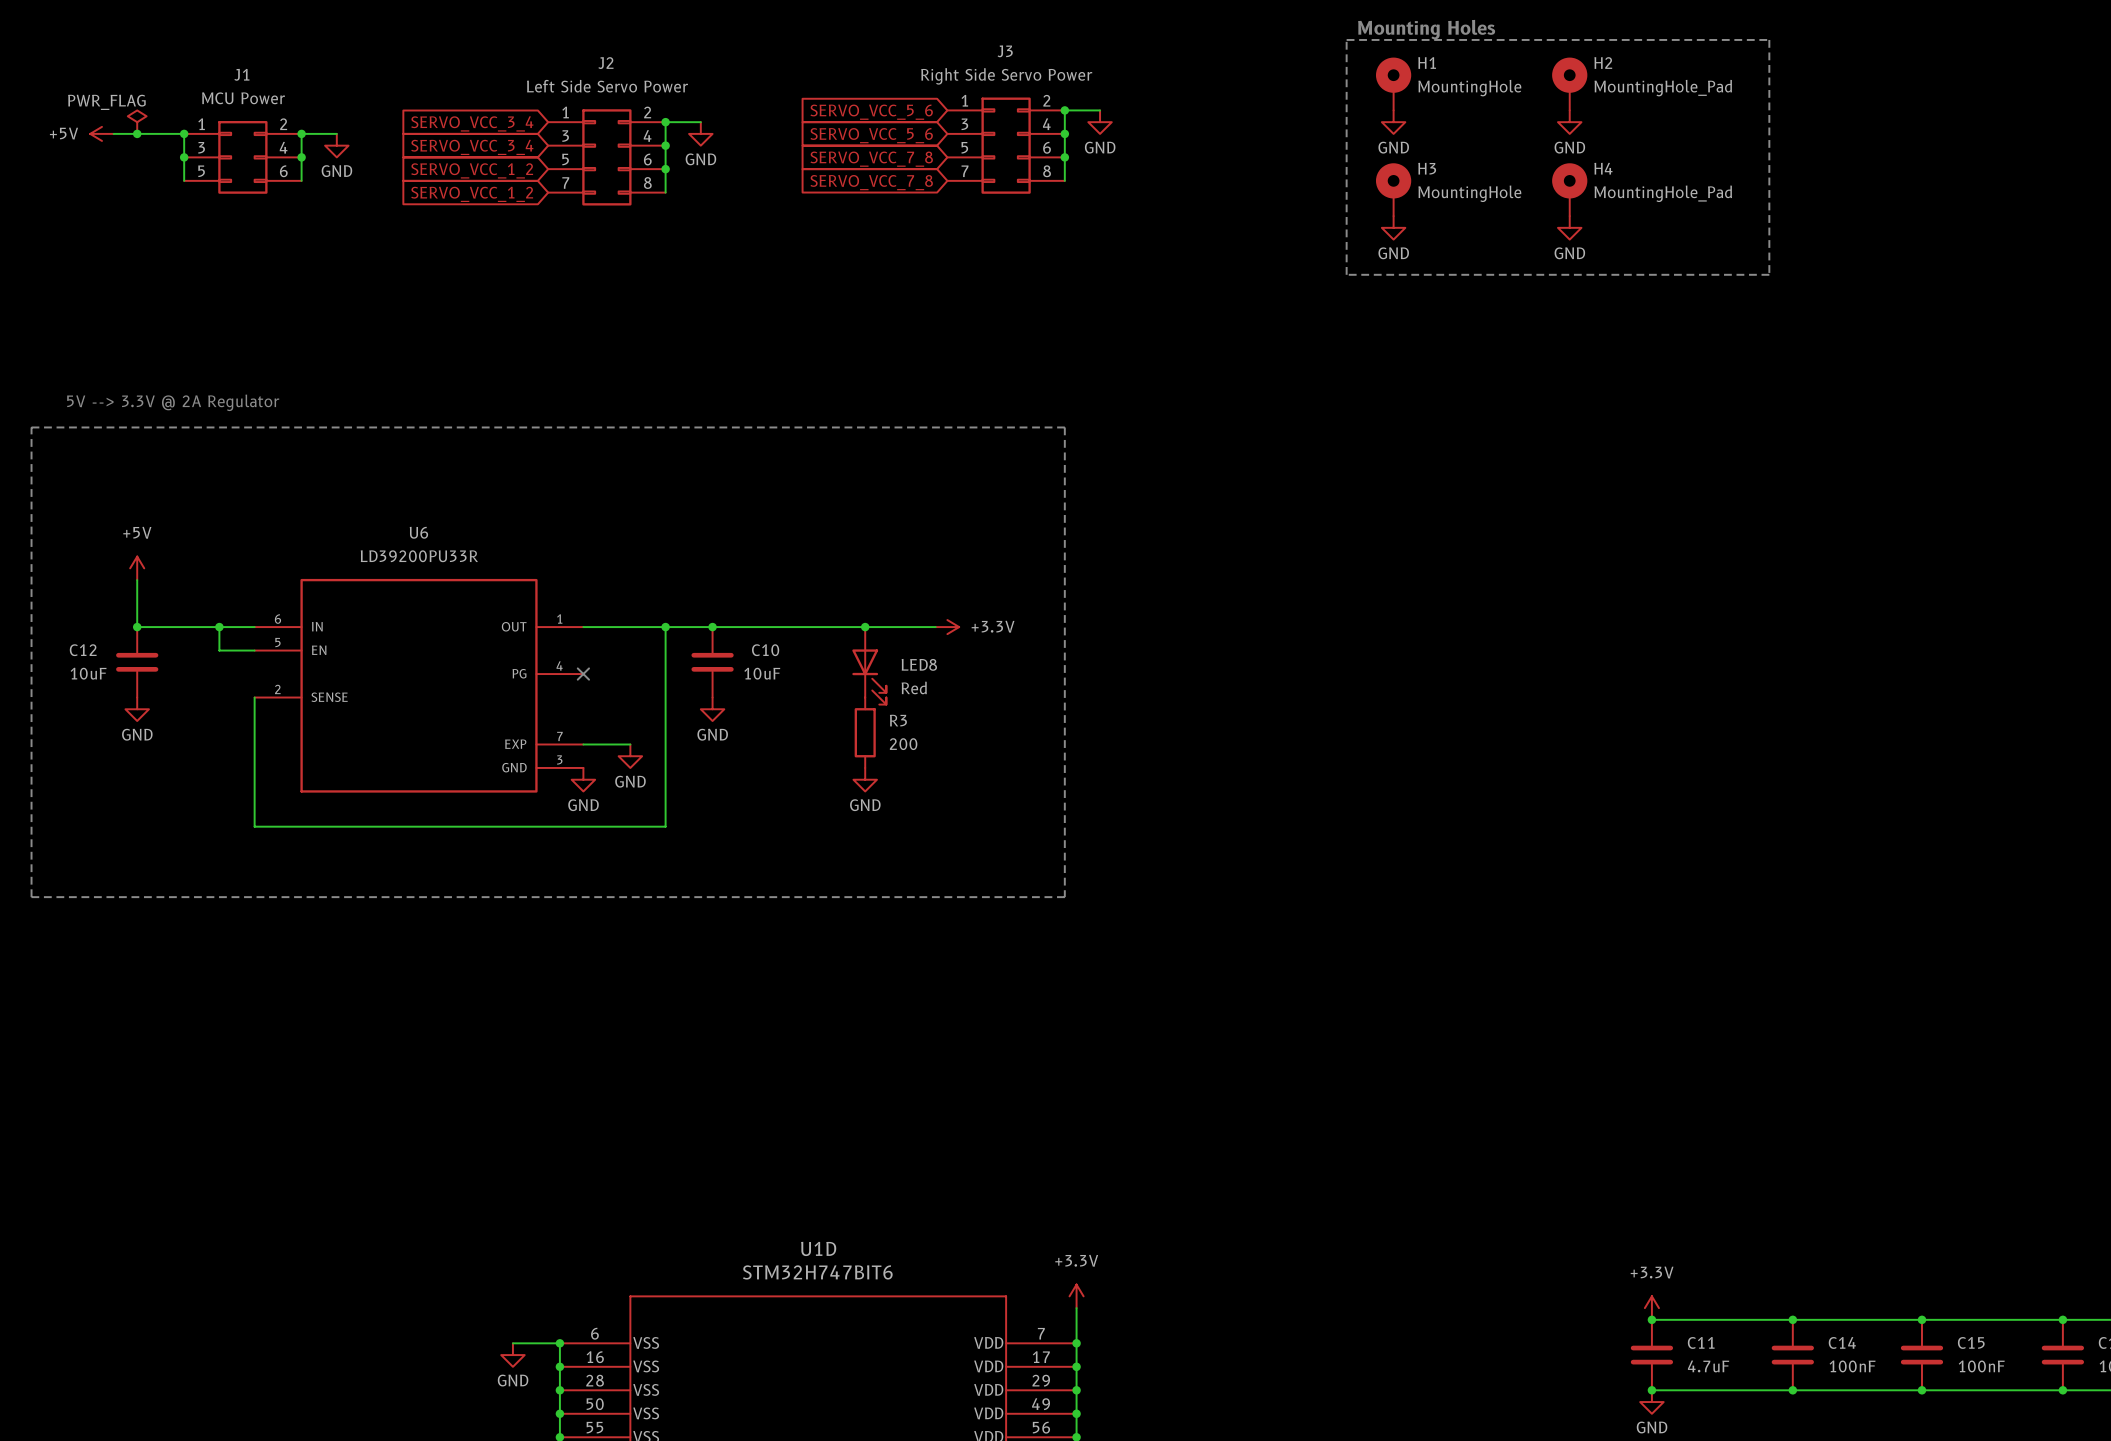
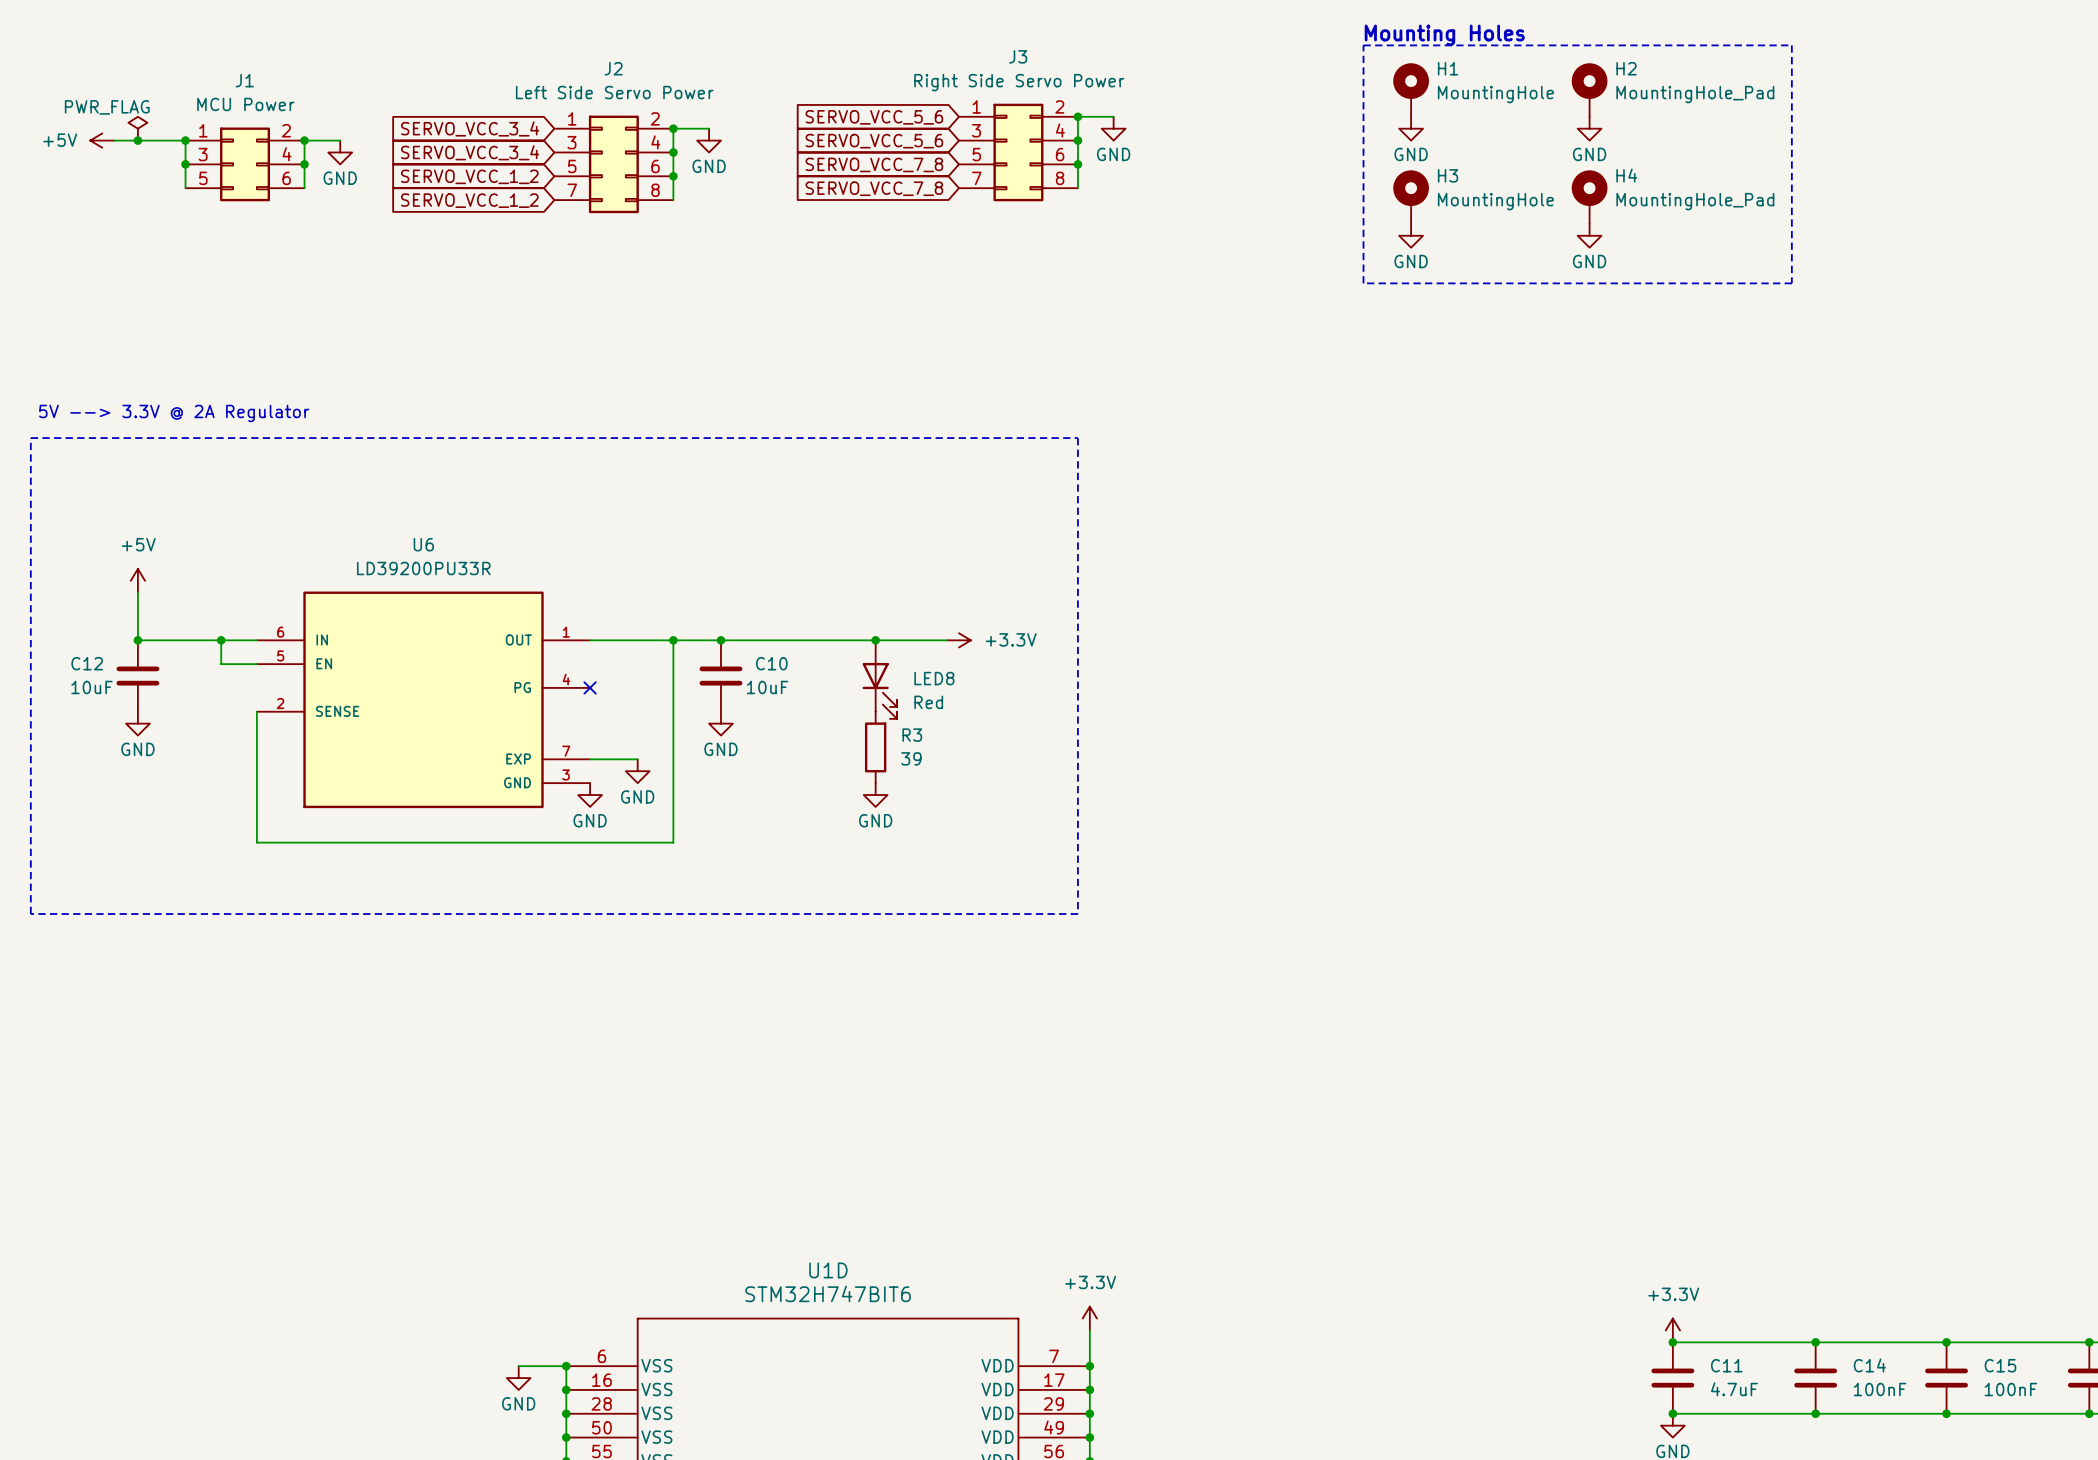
R3 value: 200 (903, 744) -> 39 (911, 758)

